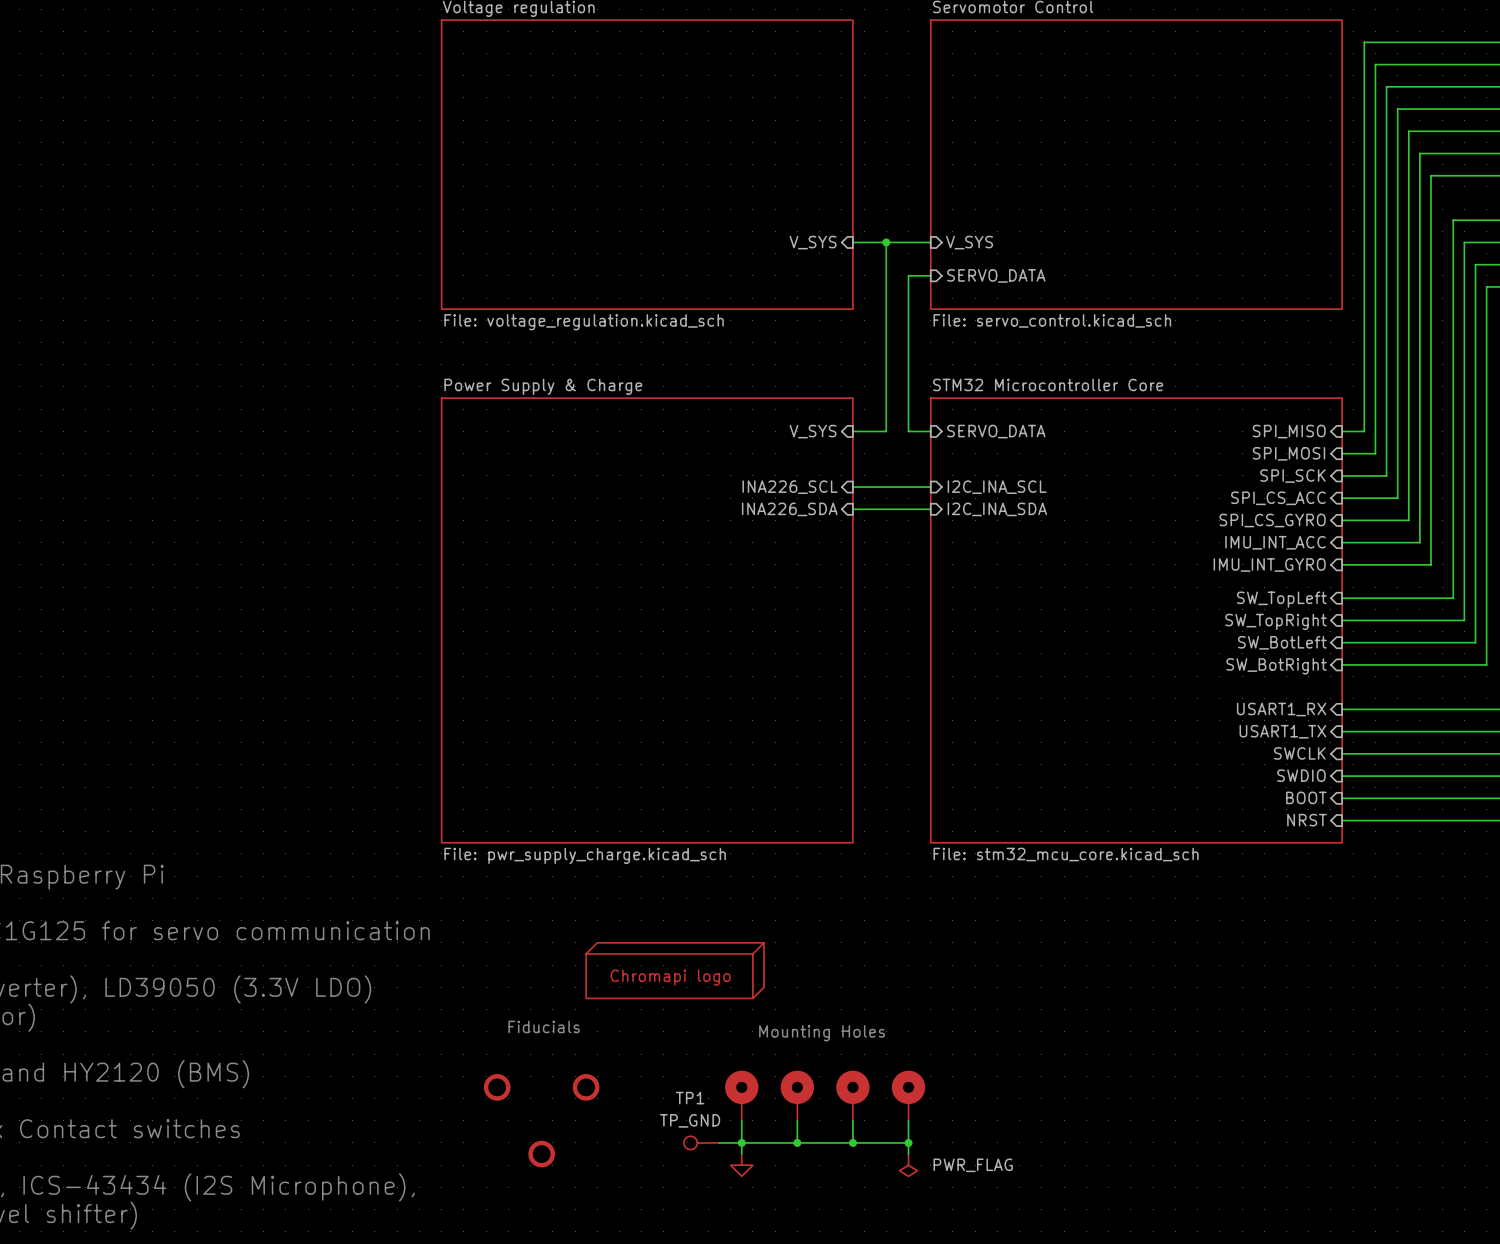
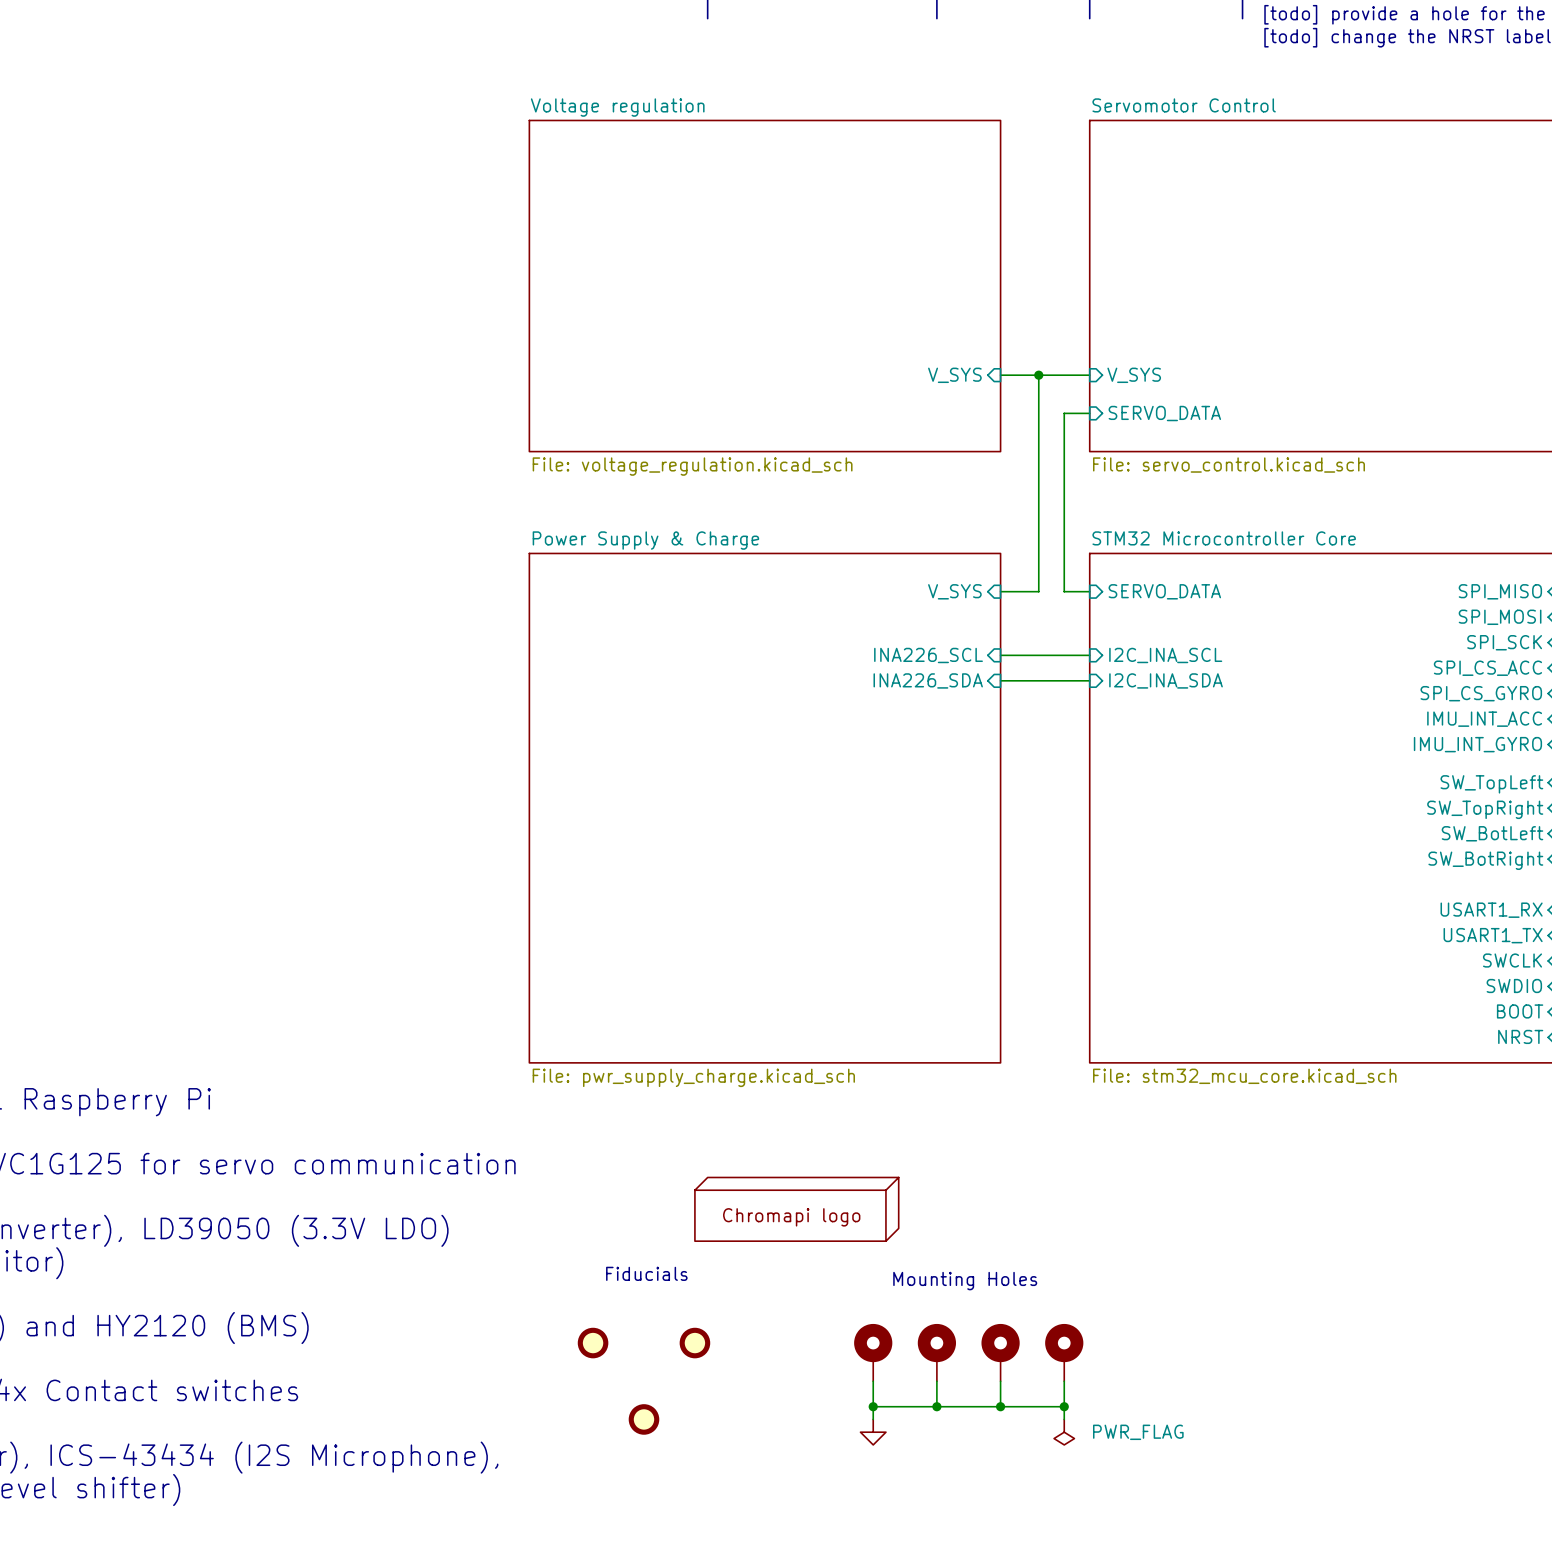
TP1: TP_GND (701, 1142) -> none
wire: (719, 1142) (741, 1142) -> none

